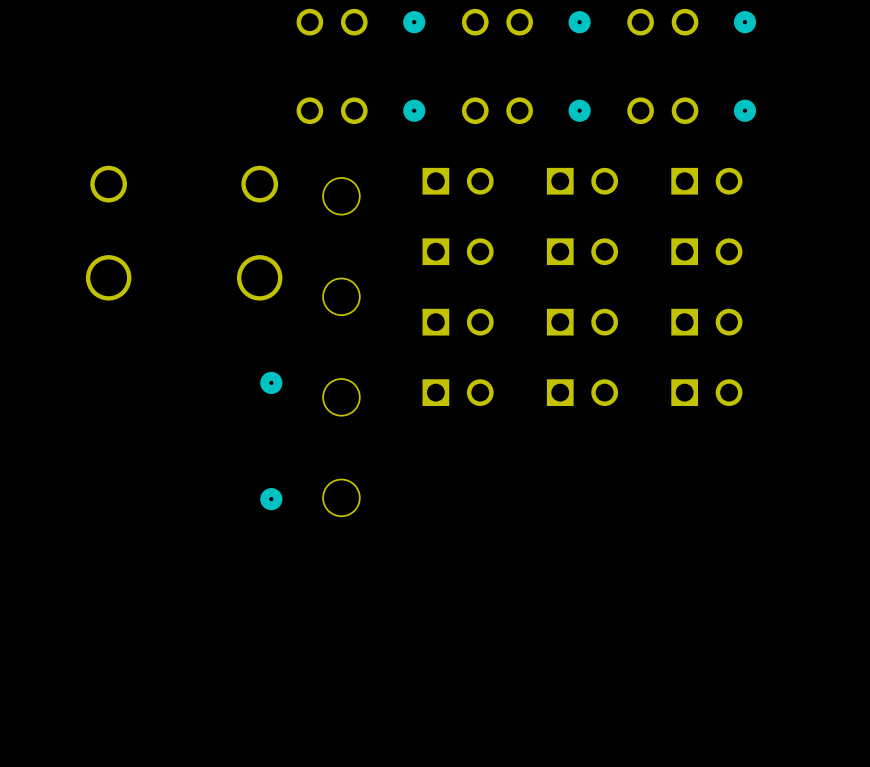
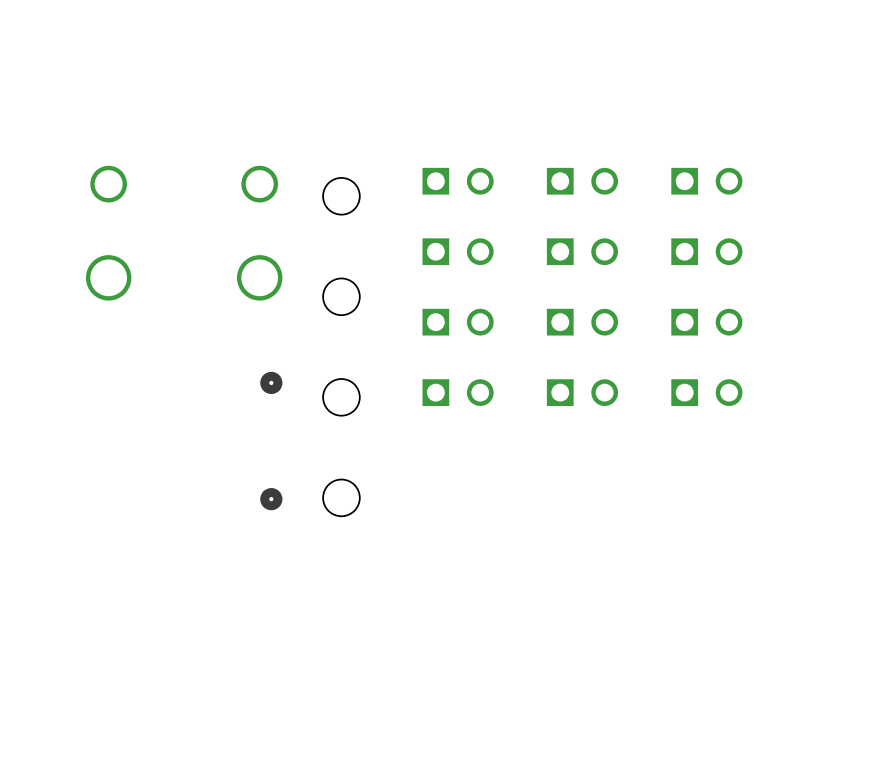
part: (360, 22) -> none
part: (526, 22) -> none
part: (691, 22) -> none
part: (360, 110) -> none
part: (526, 110) -> none
part: (691, 110) -> none

